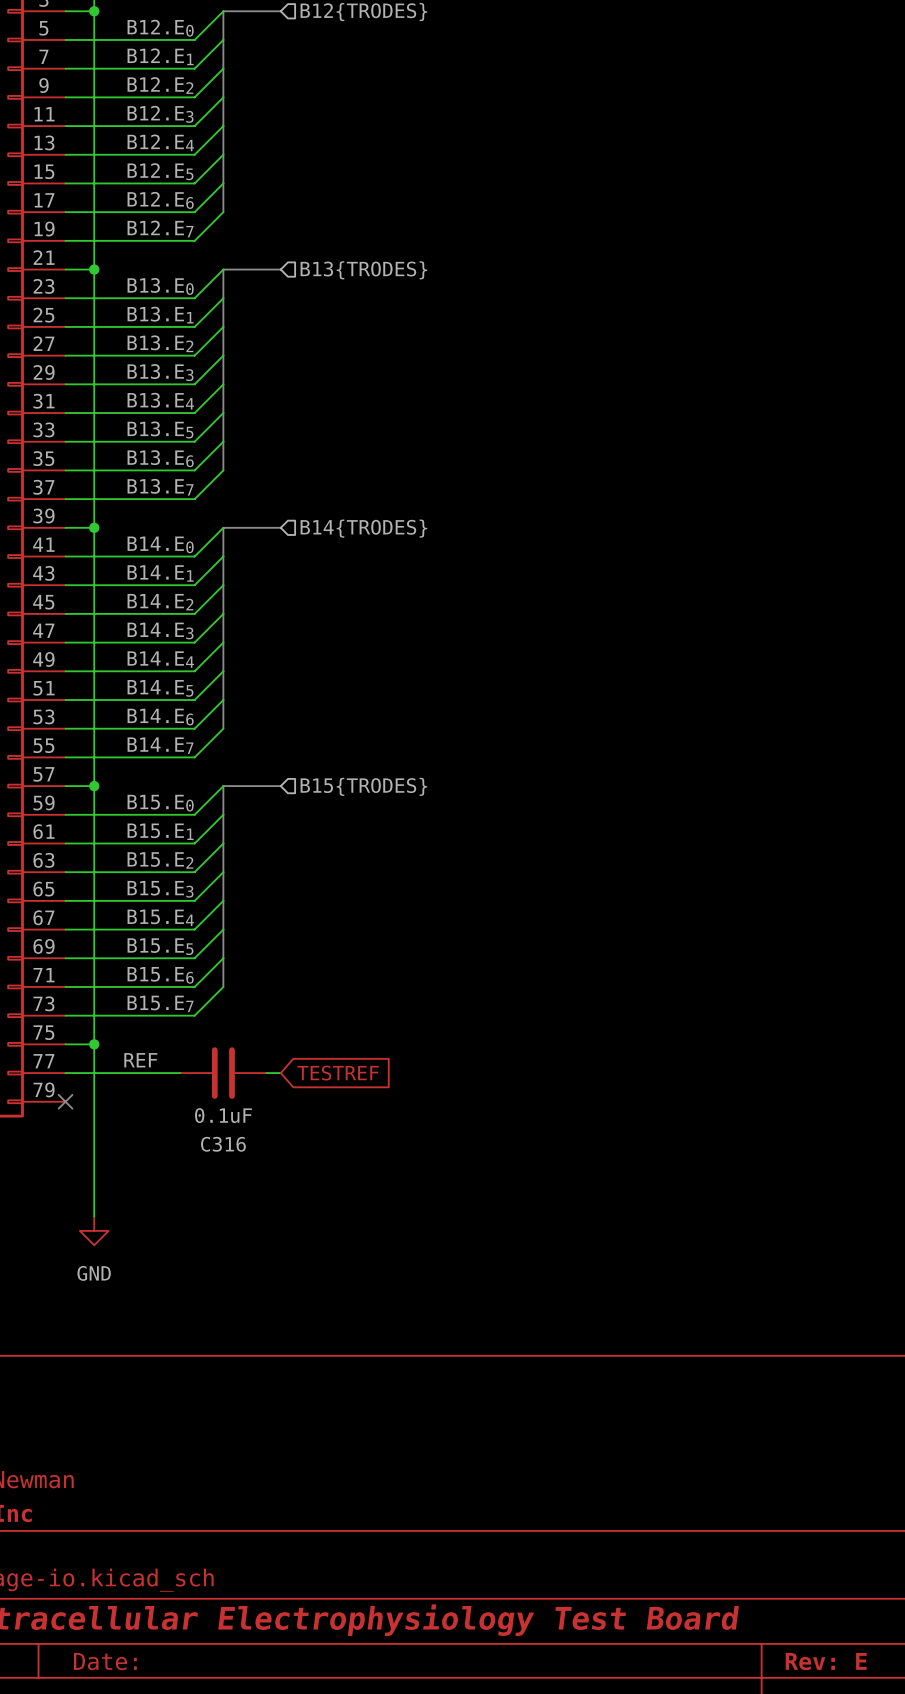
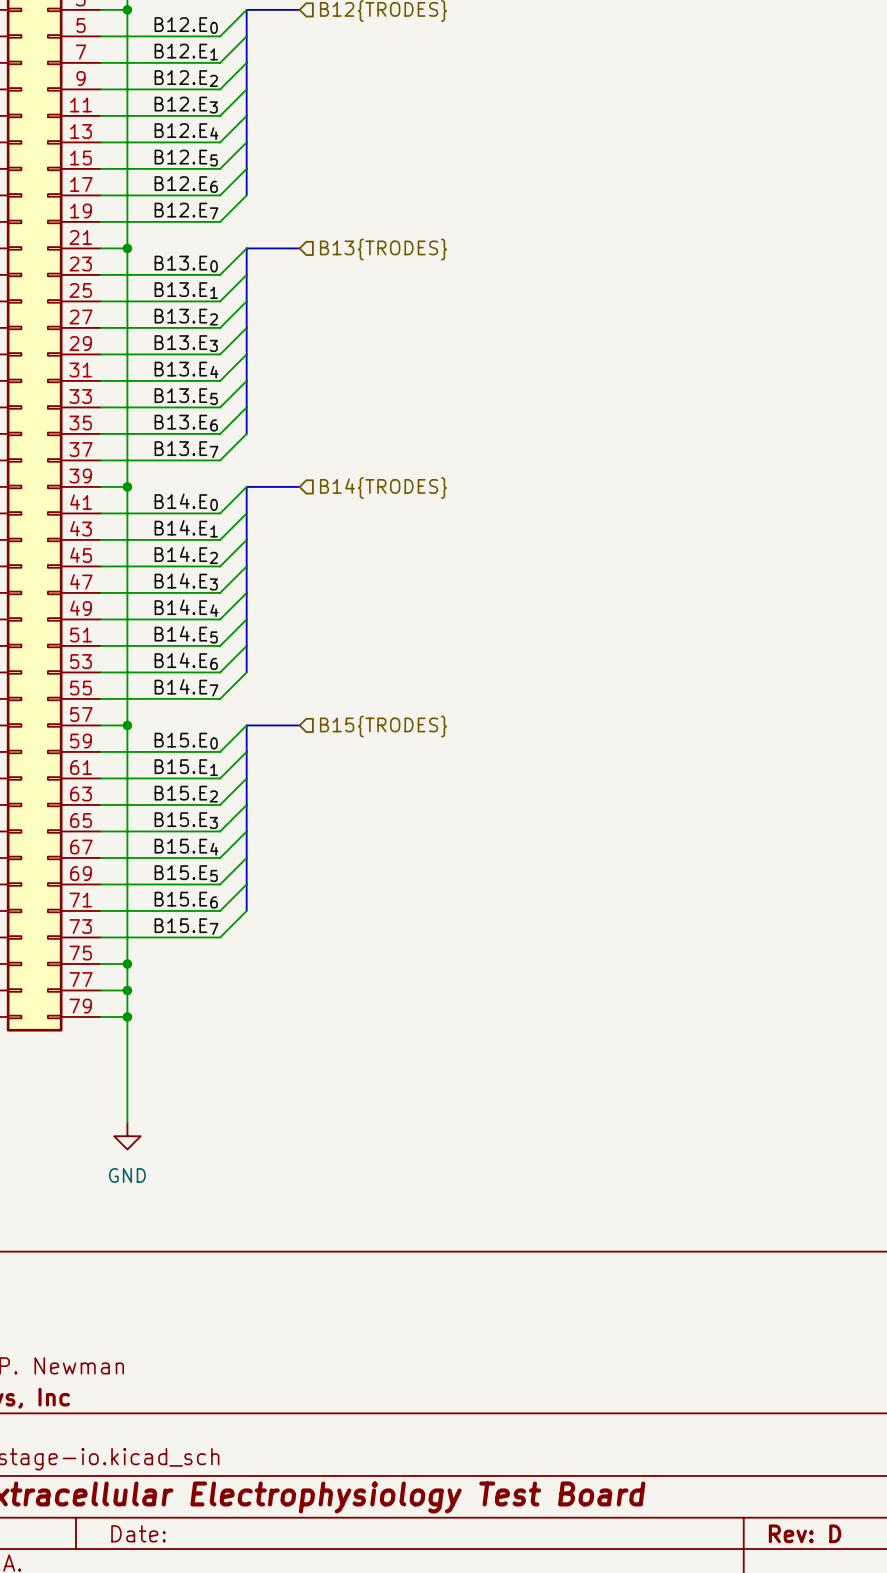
label: REF (140, 1060) -> none
wire: (94, 1073) (180, 1073) -> none
junction: none -> (127, 990)
C316: 0.1uF (223, 1073) -> none
wire: (266, 1073) (280, 1073) -> none
global label: TESTREF (338, 1073) -> none
wire: none -> (100, 1016) (127, 1016)
no-connect mark: (65, 1101) -> none
junction: none -> (127, 1016)
title block: Rev: E (826, 1661) -> Rev: D (805, 1533)

